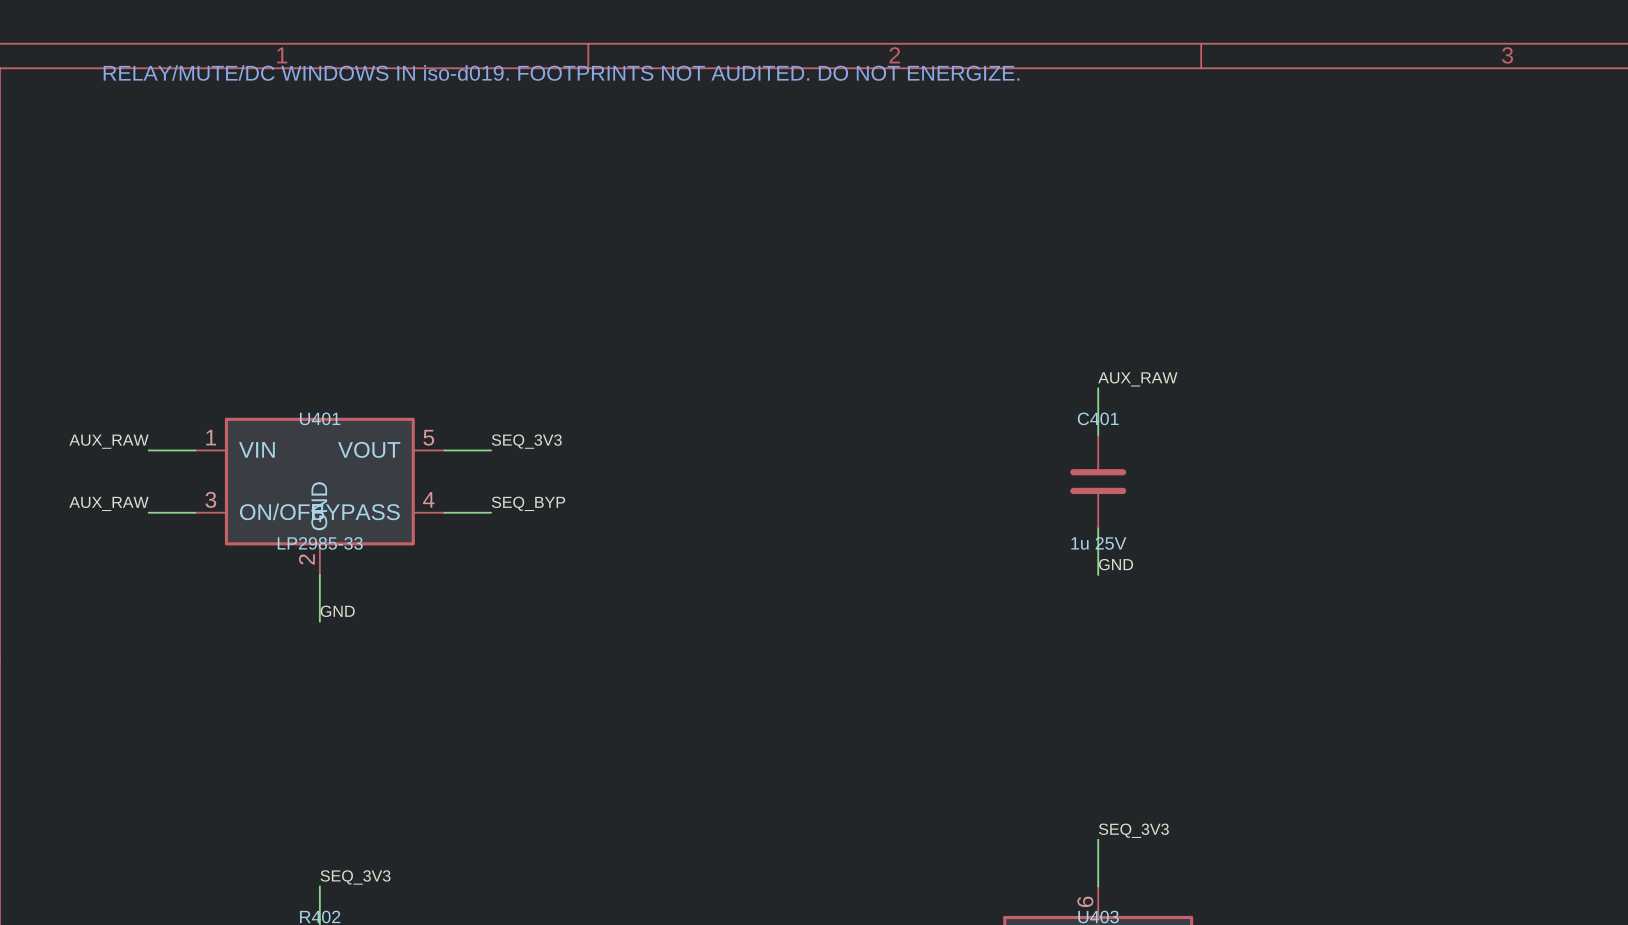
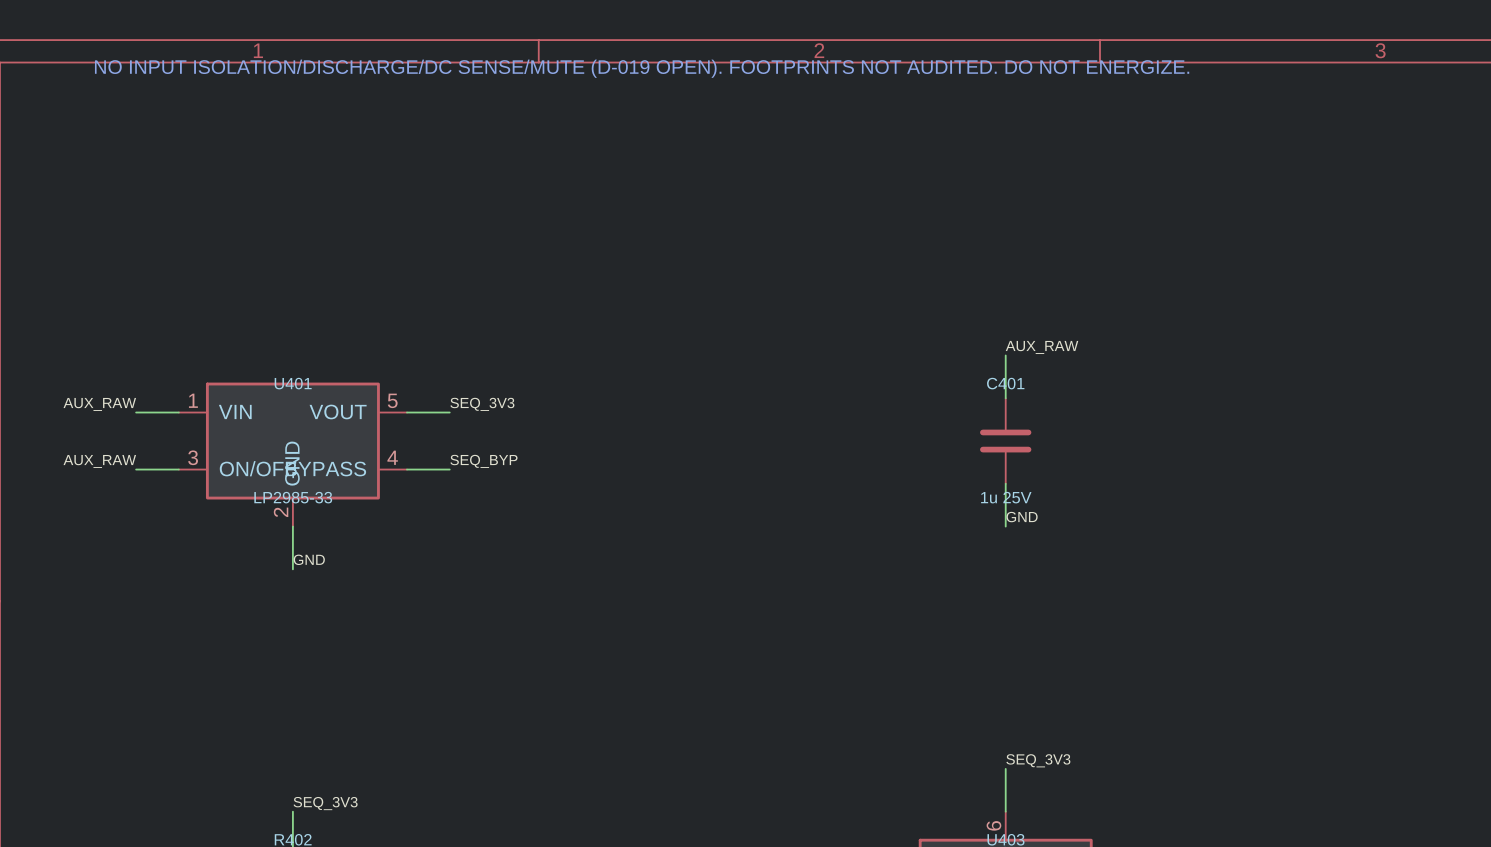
text: RELAY/MUTE/DC WINDOWS IN iso-d019. FOOTPRINTS NOT AUDITED. DO NOT ENERGIZE. (561, 72) -> NO INPUT ISOLATION/DISCHARGE/DC SENSE/MUTE (D-019 OPEN). FOOTPRINTS NOT AUDITED. DO NOT ENERGIZE. (642, 68)

